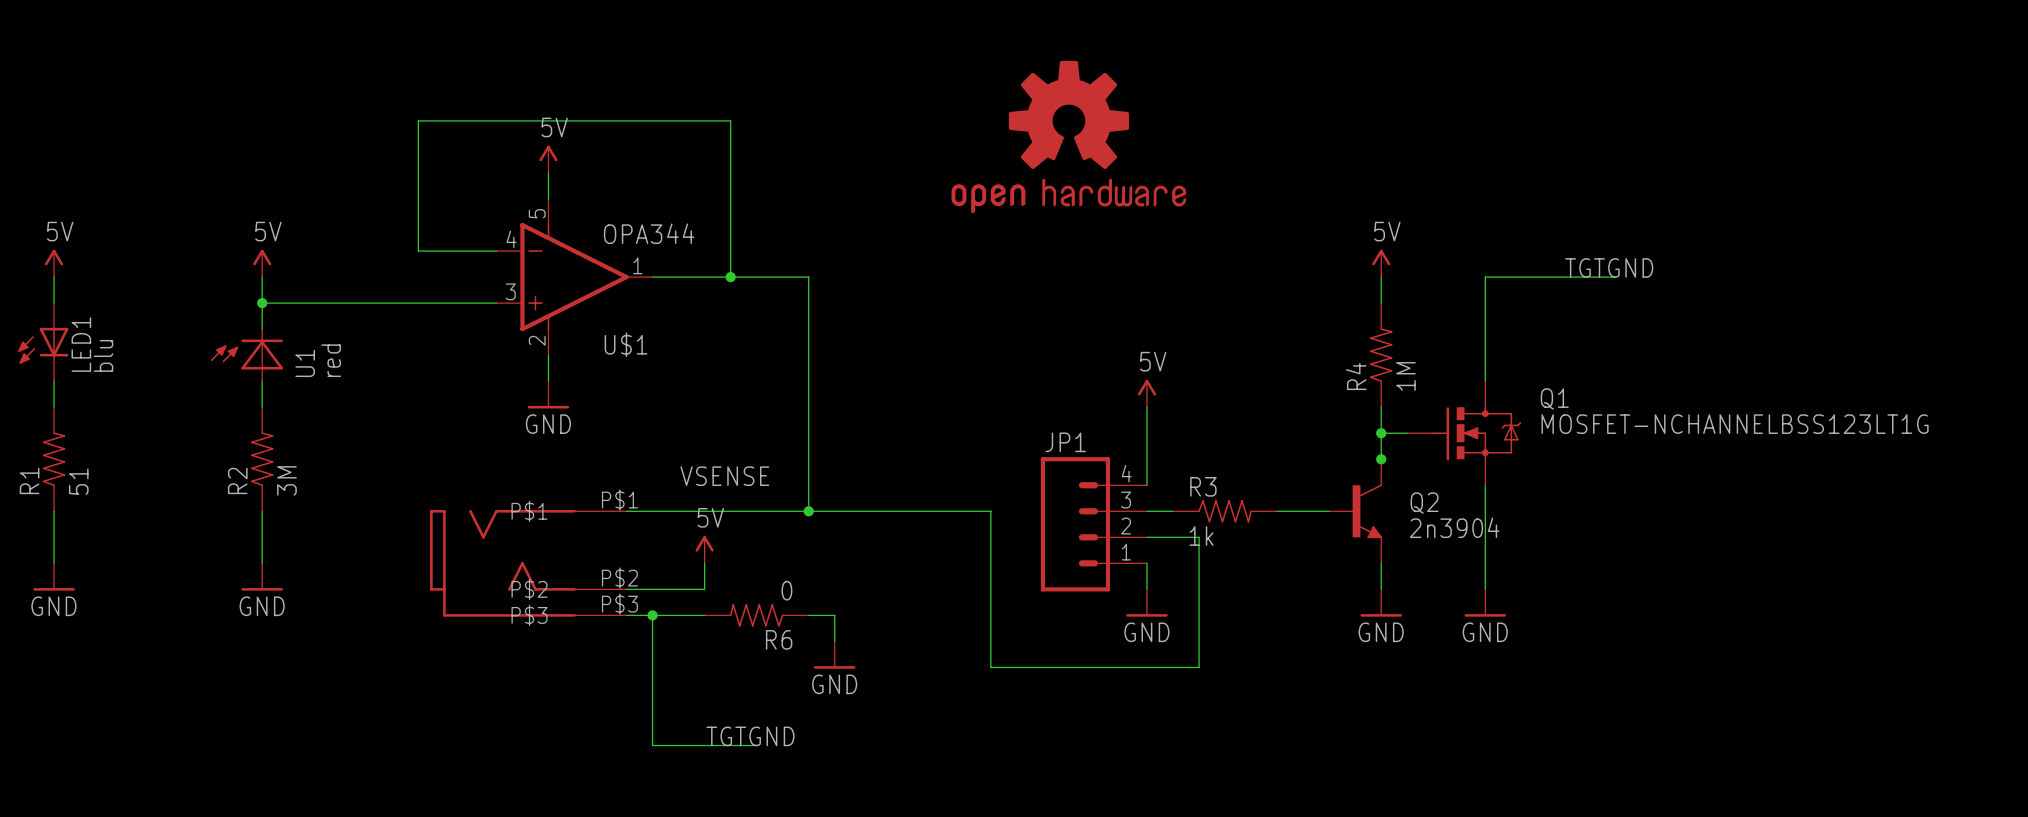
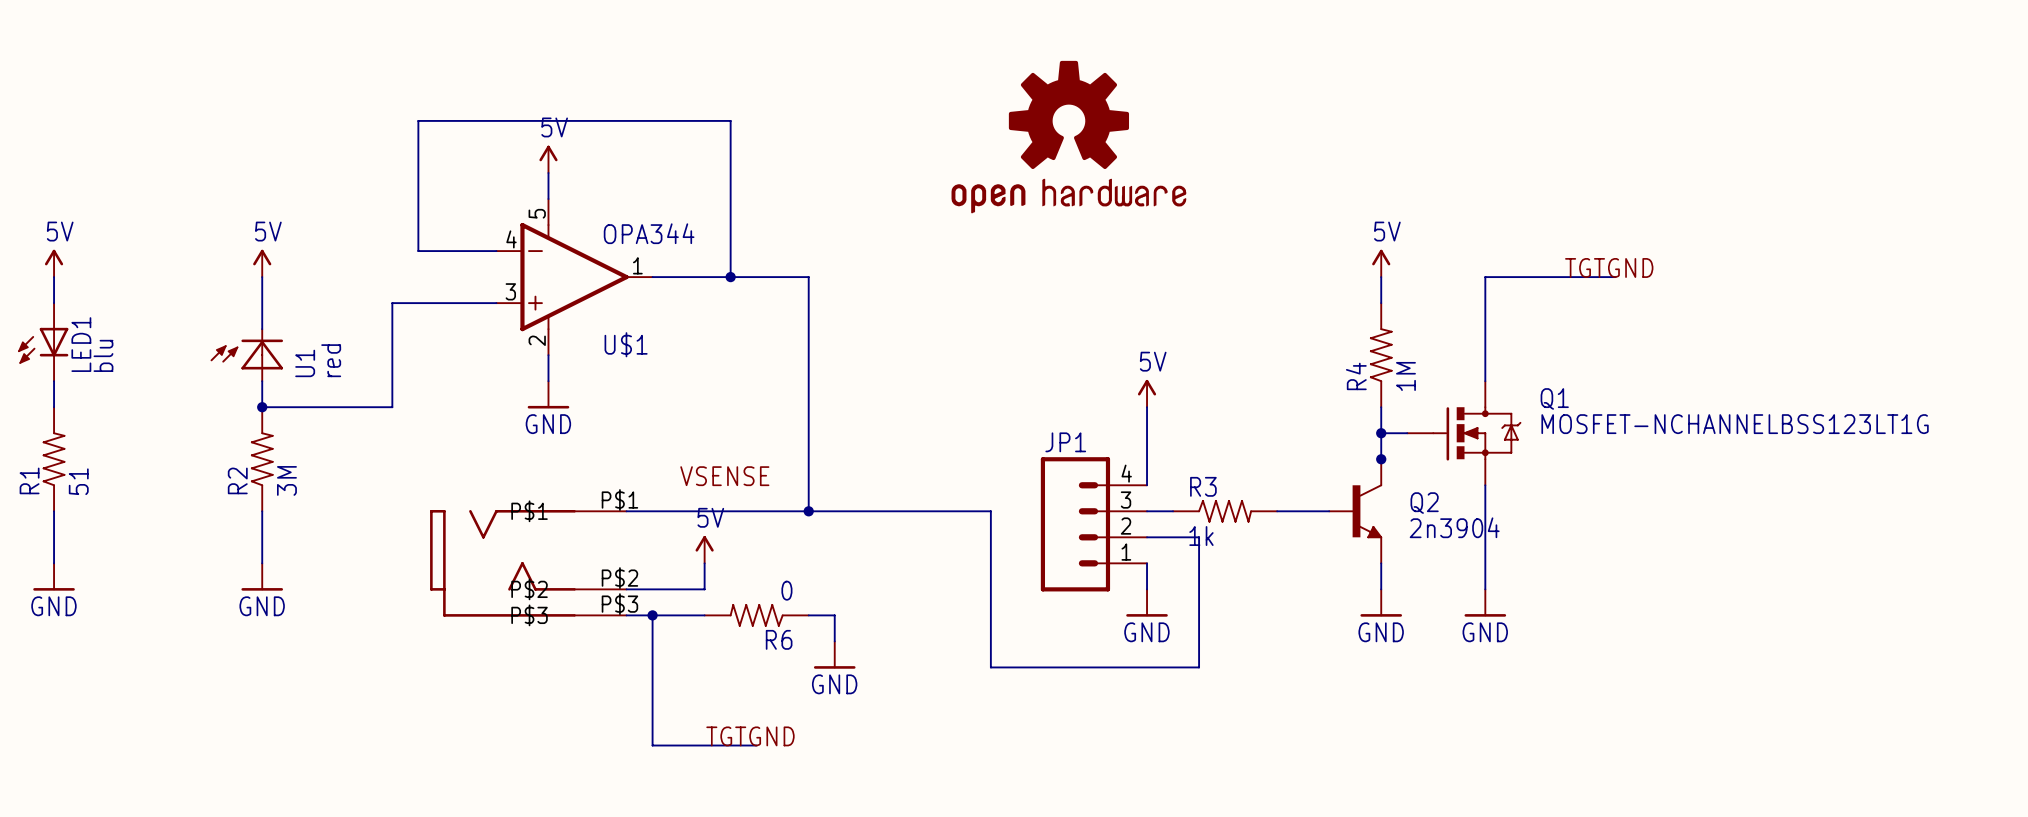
wire: (262, 303) (392, 303) -> (262, 407) (392, 407) (392, 303)
junction: (262, 303) -> none
junction: none -> (262, 407)

